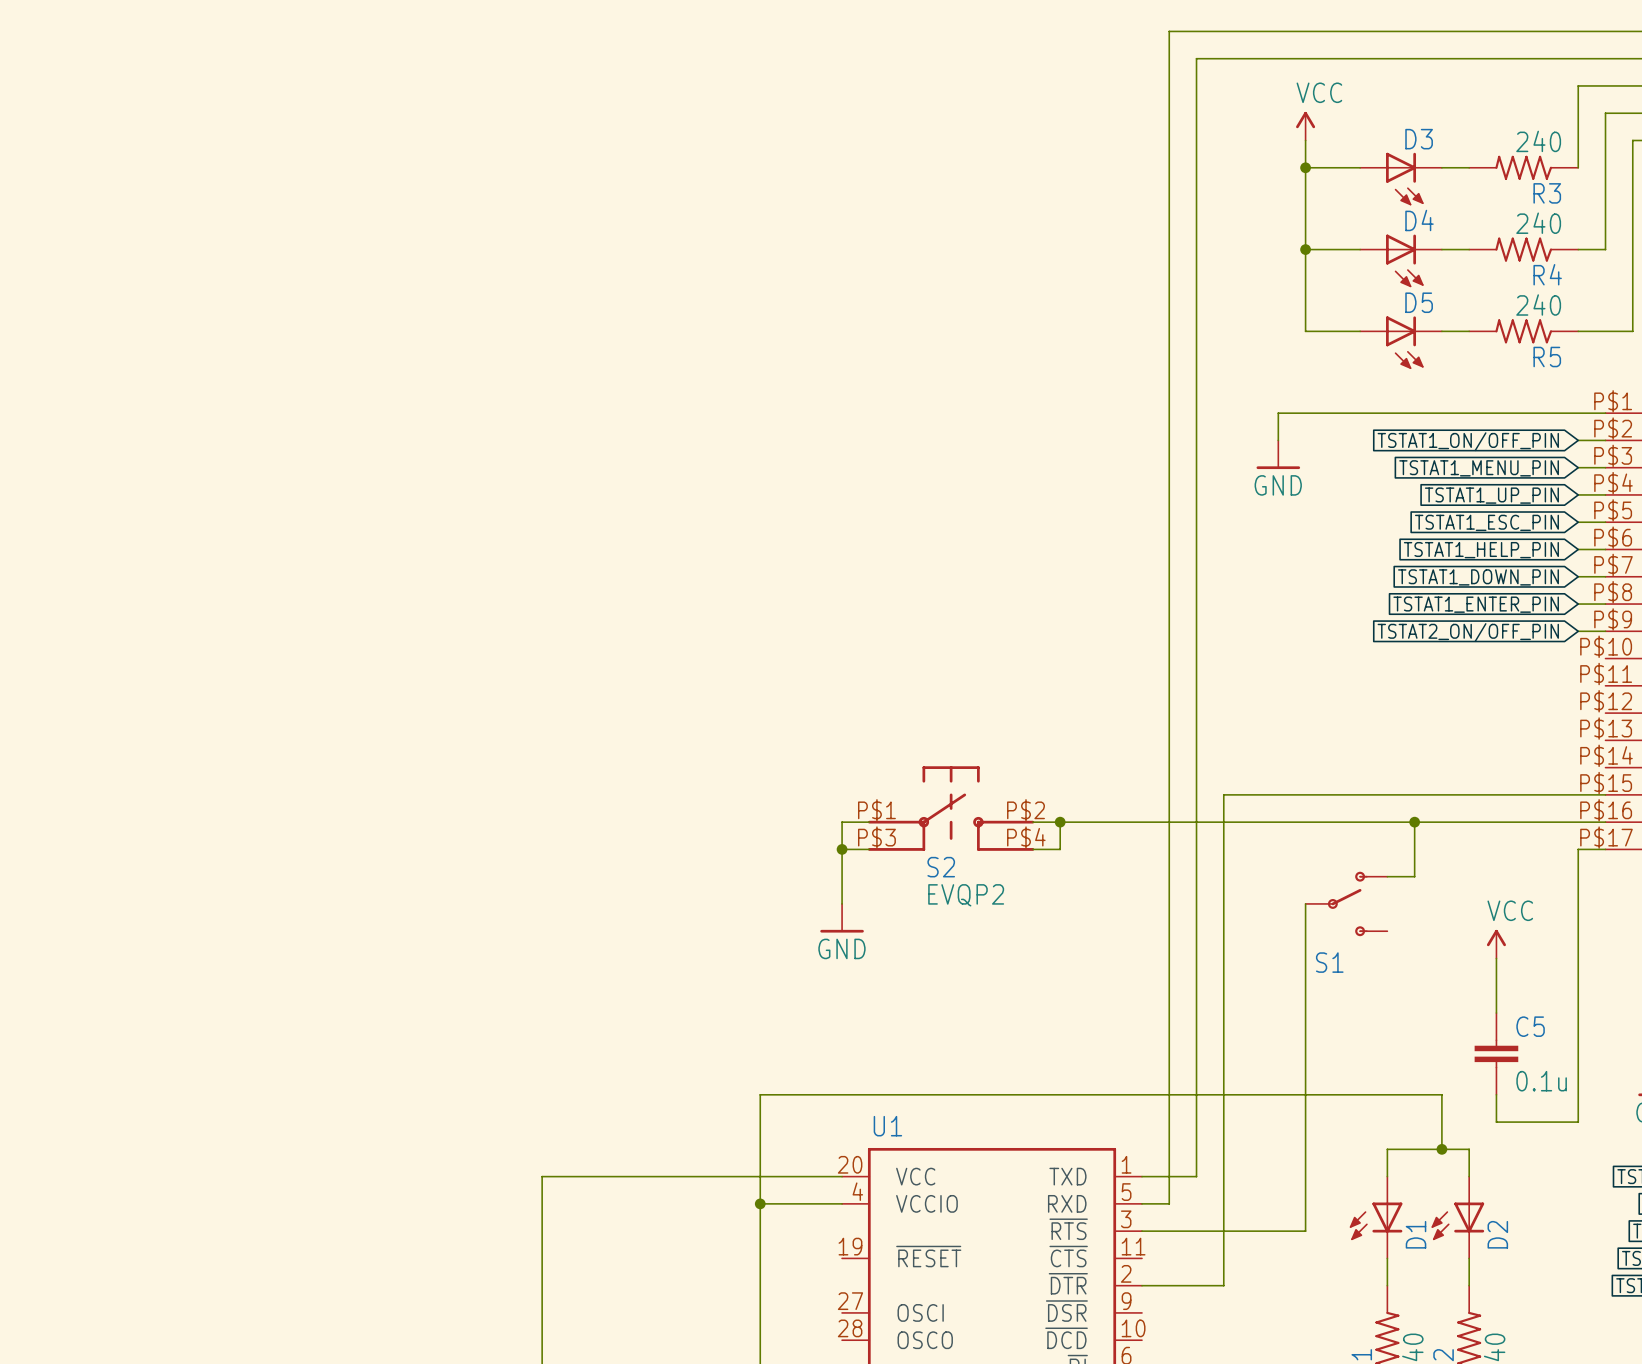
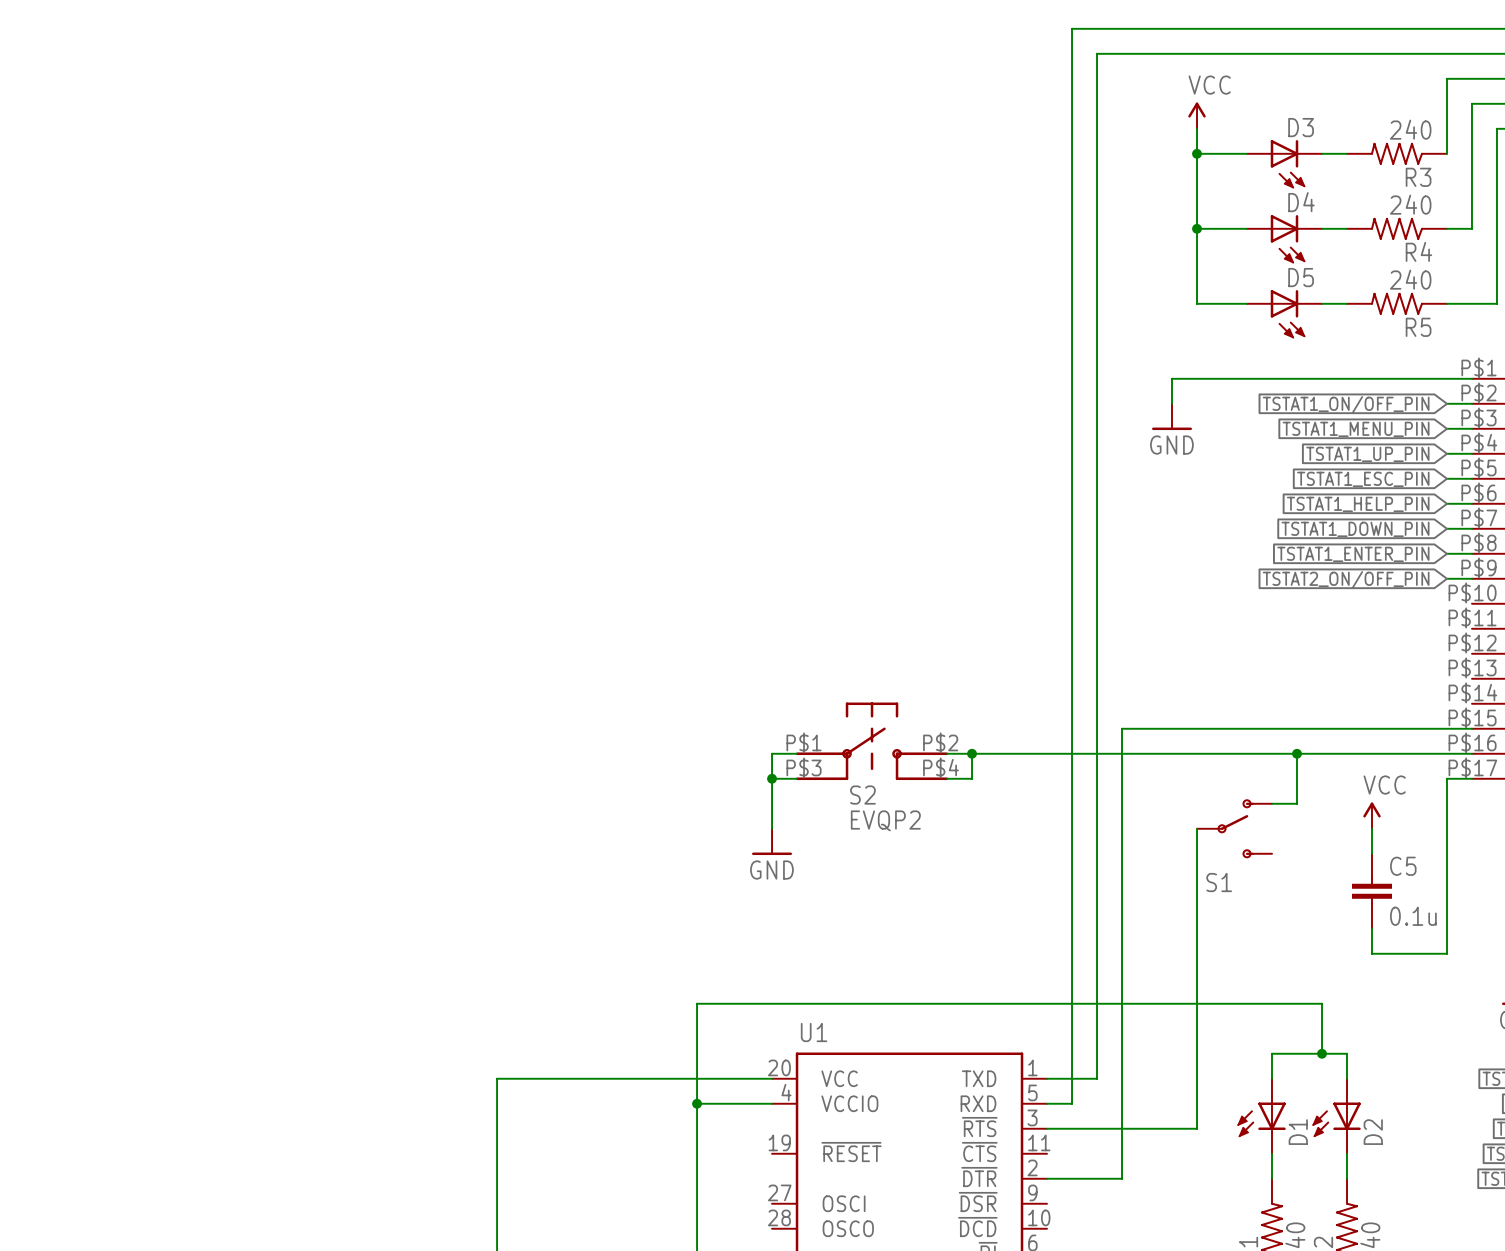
wire: none -> (1371, 828) (1371, 853)
power symbol position: VCC (1496, 944) -> VCC (1371, 815)
wire: (1578, 1040) (1578, 1122) (1496, 1122) (1496, 1094) -> (1446, 953) (1371, 953) (1371, 928)
C5 position: (1496, 1053) -> (1371, 891)

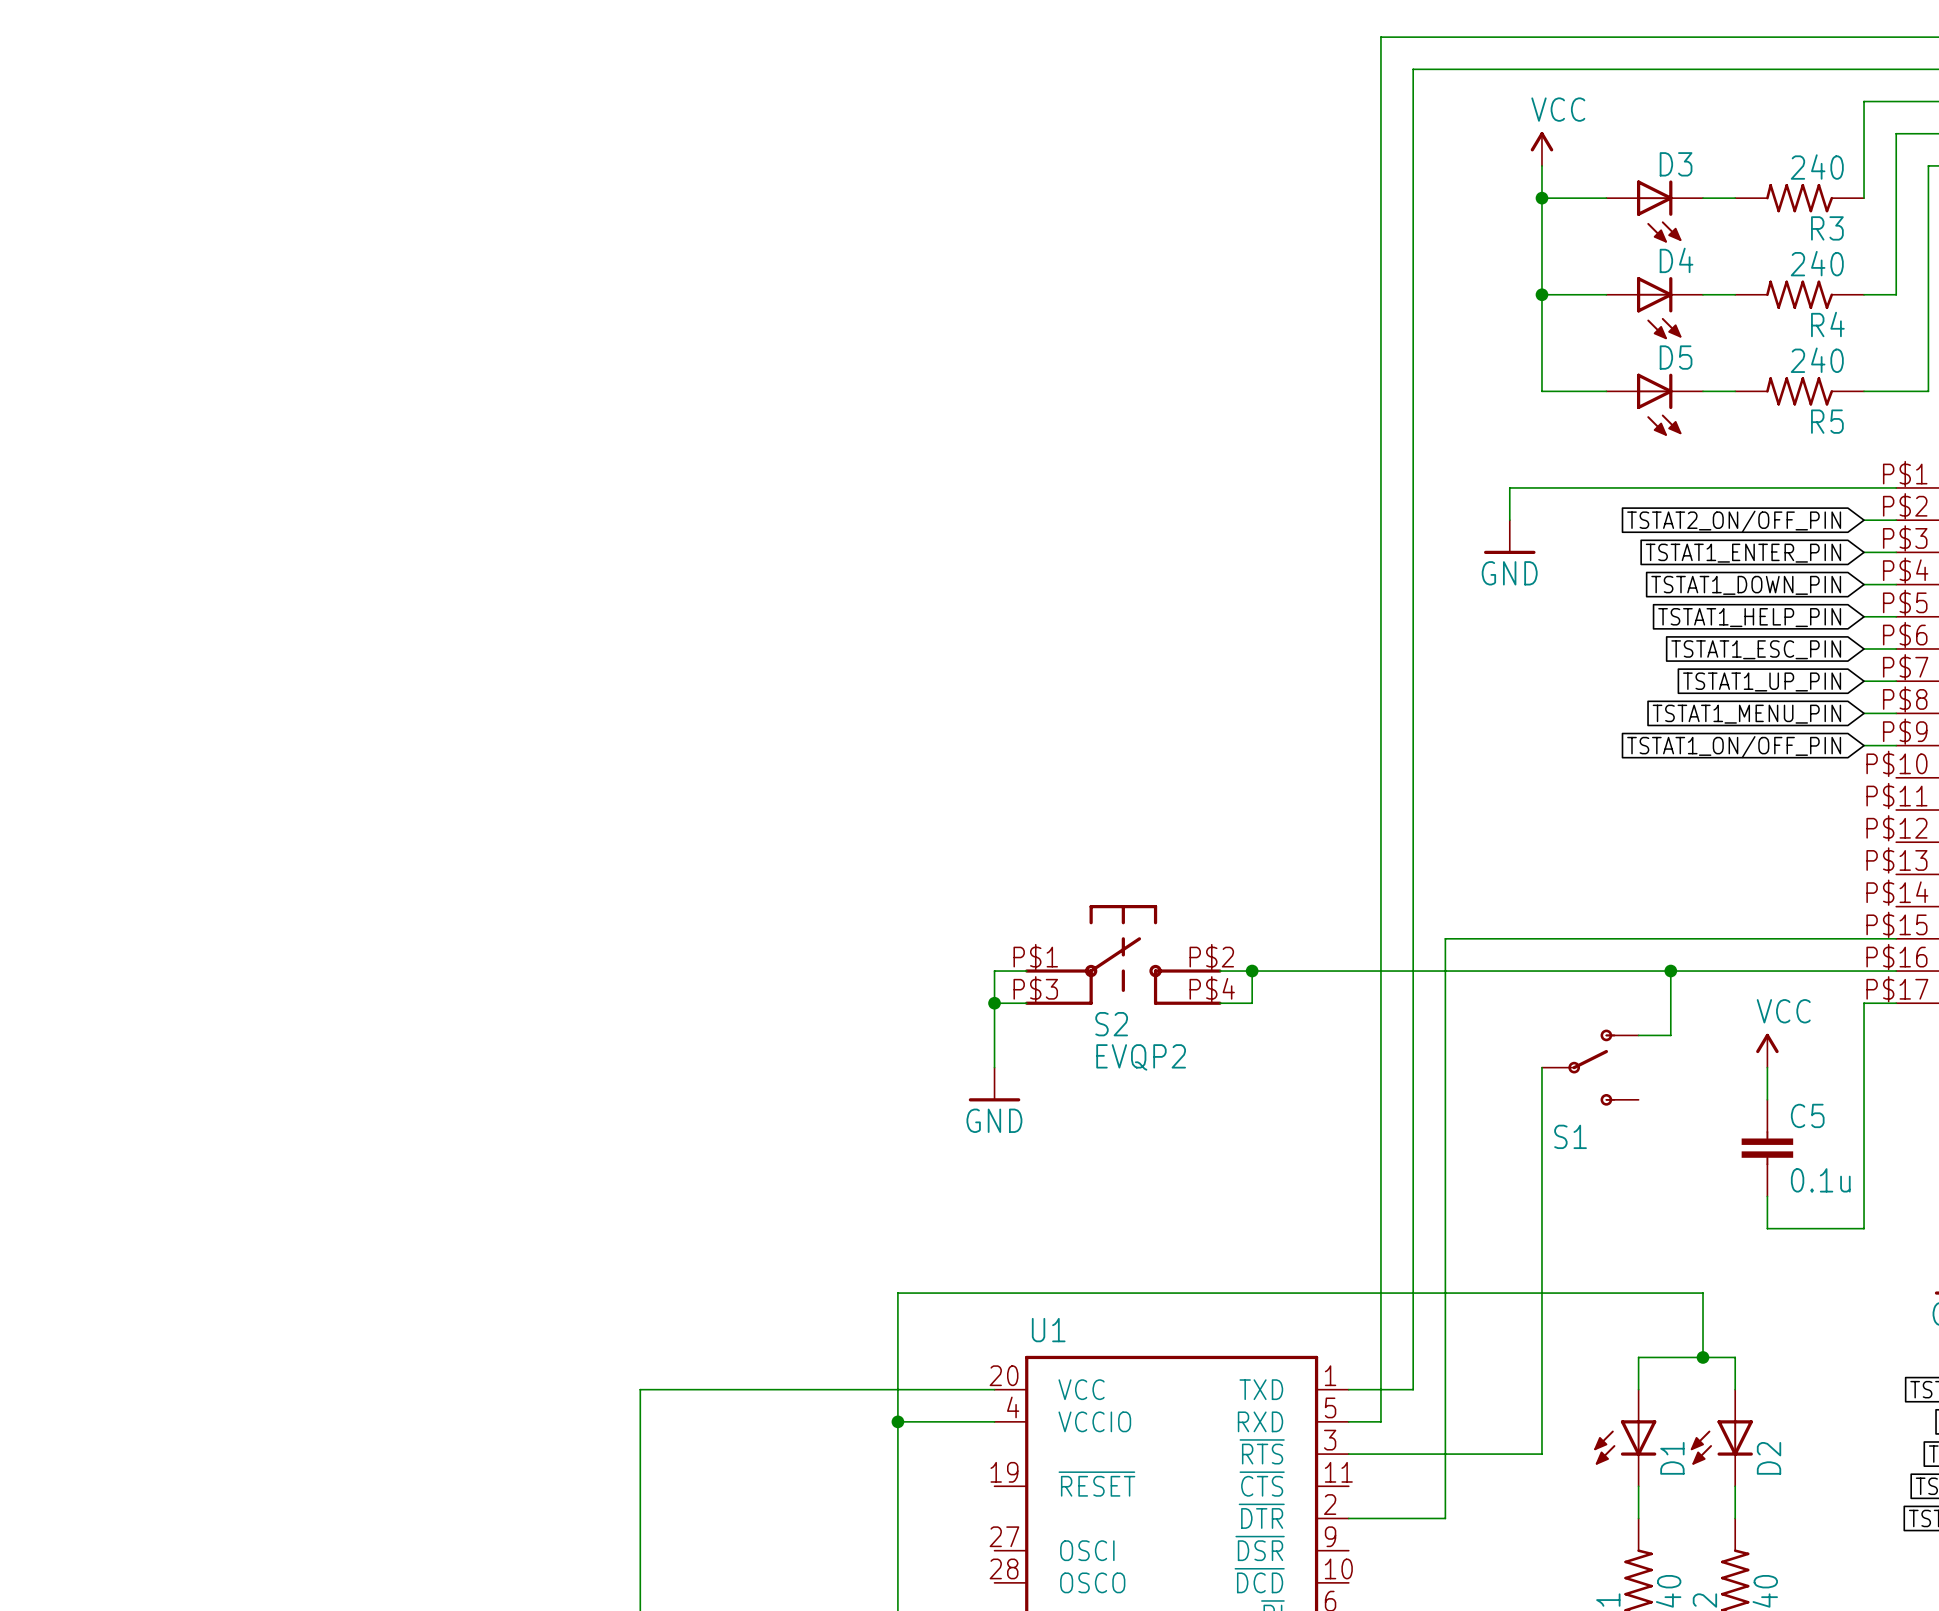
global label: TSTAT1_ON/OFF_PIN (1346, 404) -> TSTAT2_ON/OFF_PIN (1734, 521)
global label: TSTAT1_MENU_PIN (1356, 429) -> TSTAT1_ENTER_PIN (1743, 553)
global label: TSTAT1_UP_PIN (1367, 454) -> TSTAT1_DOWN_PIN (1746, 585)
global label: TSTAT1_ESC_PIN (1363, 479) -> TSTAT1_HELP_PIN (1749, 617)
global label: TSTAT1_HELP_PIN (1358, 504) -> TSTAT1_ESC_PIN (1756, 649)
global label: TSTAT1_DOWN_PIN (1355, 529) -> TSTAT1_UP_PIN (1762, 681)
global label: TSTAT1_ENTER_PIN (1353, 554) -> TSTAT1_MENU_PIN (1746, 714)
global label: TSTAT2_ON/OFF_PIN (1346, 579) -> TSTAT1_ON/OFF_PIN (1734, 747)

